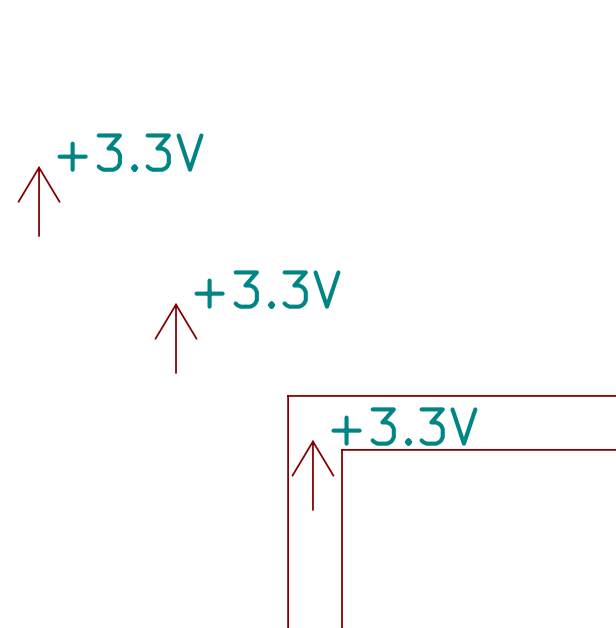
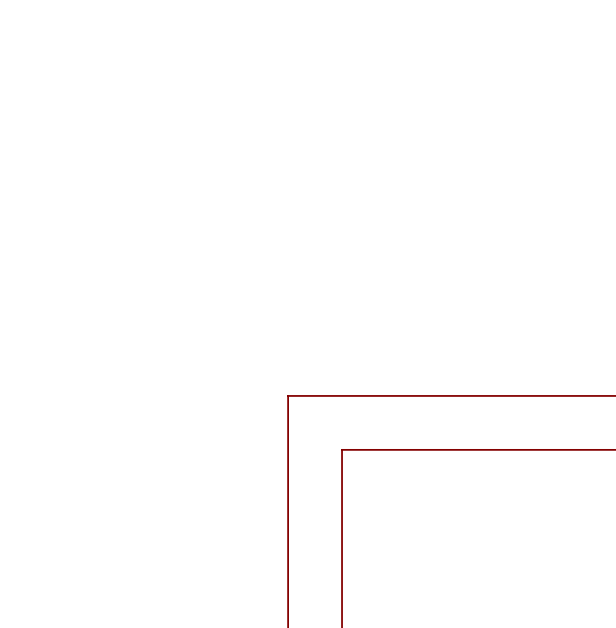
power symbol: +3.3V (39, 201) -> none
power symbol: +3.3V (176, 338) -> none
power symbol: +3.3V (312, 475) -> none

